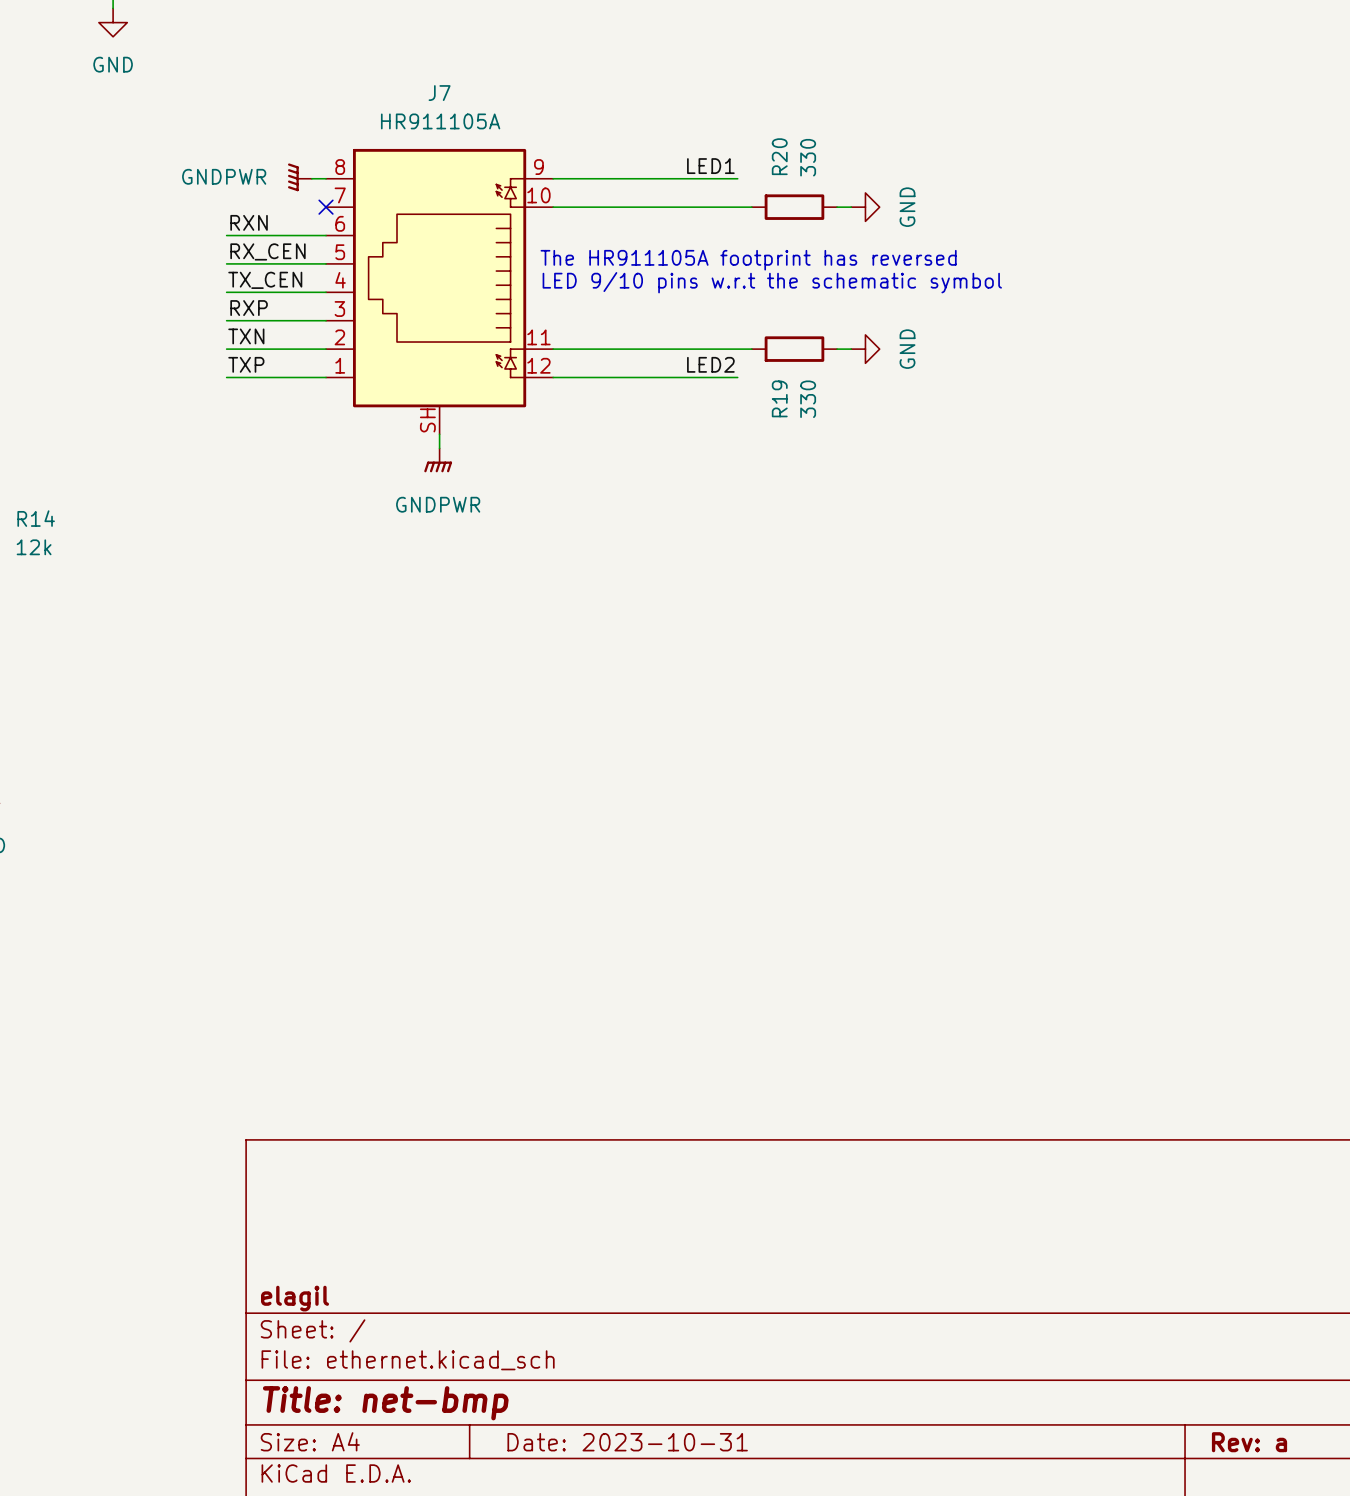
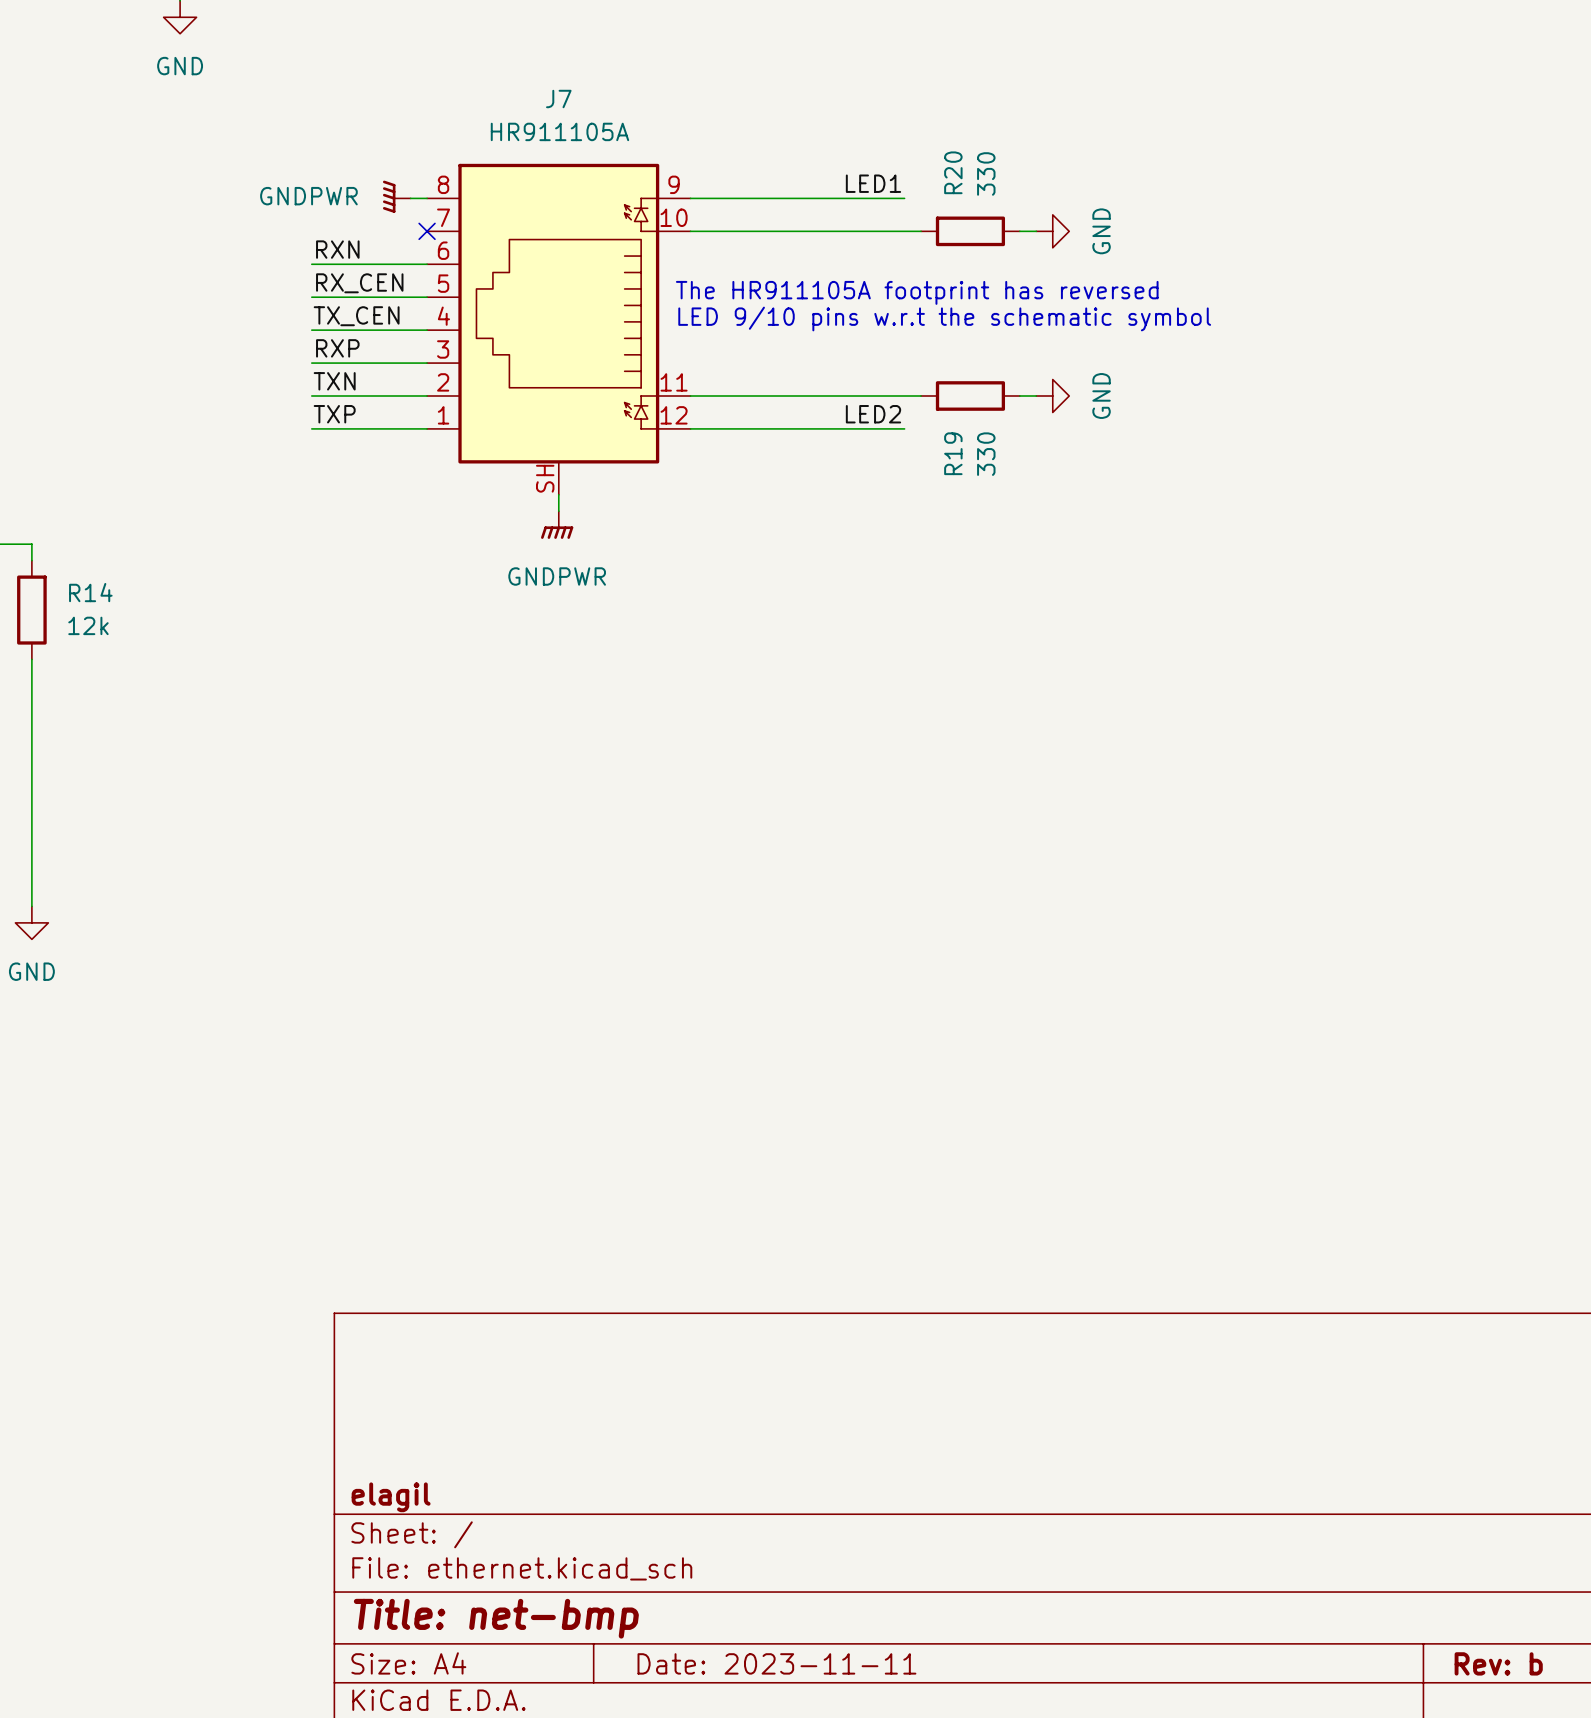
title block: Date: 2023-10-31 (627, 1442) -> Date: 2023-11-11 (776, 1663)
title block: Rev: a (1249, 1442) -> Rev: b (1498, 1663)

